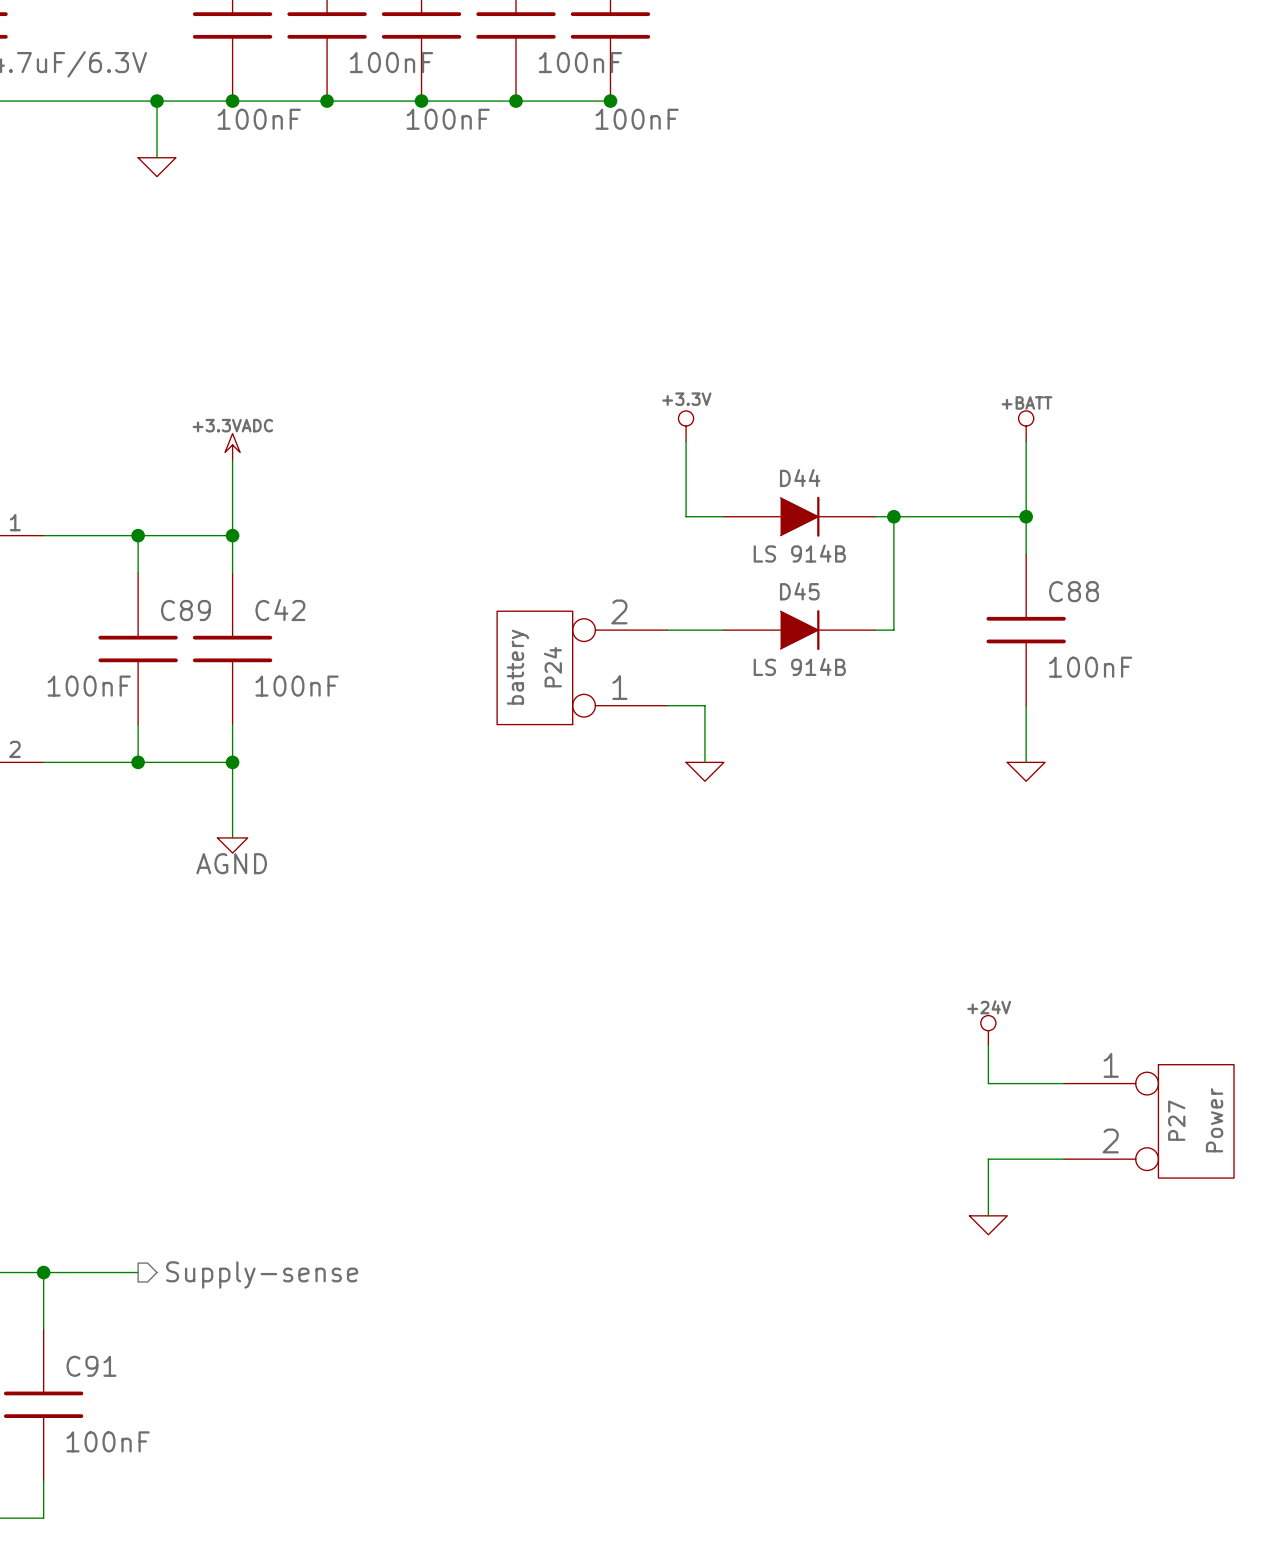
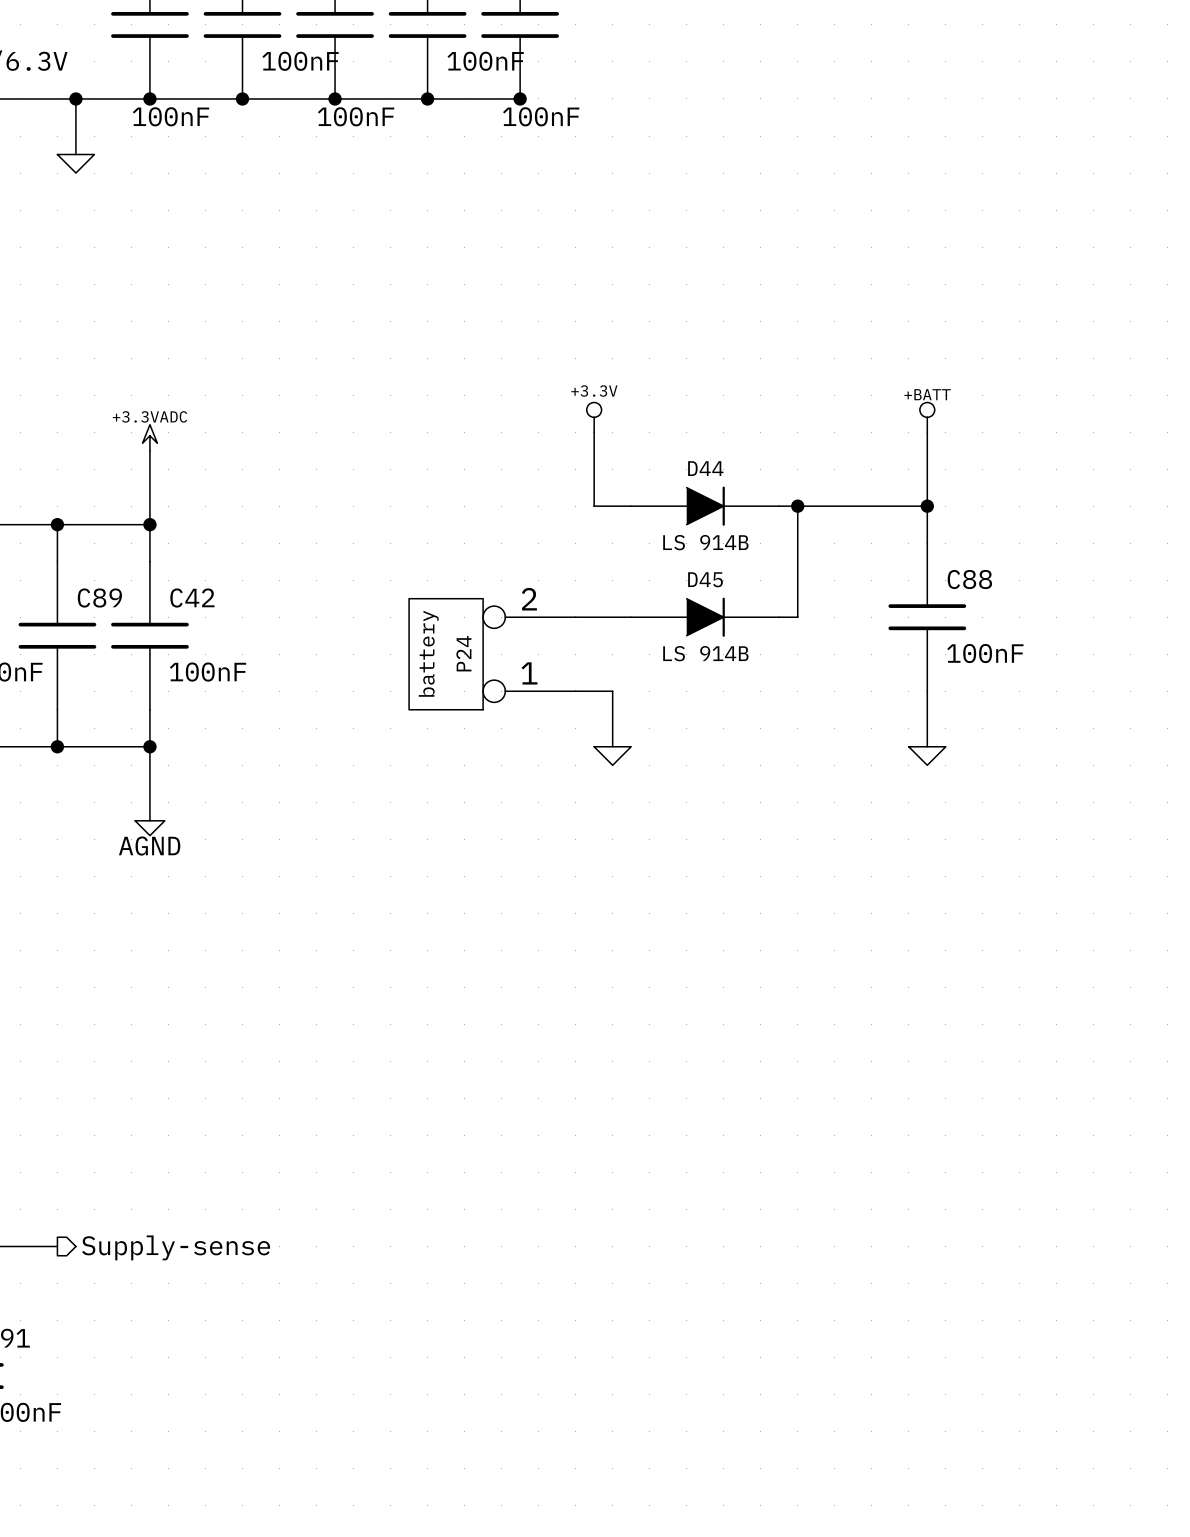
power symbol: +24V (988, 1030) -> none
wire: (988, 1045) (988, 1083) (1063, 1083) -> none
P27: Power (1148, 1121) -> none
wire: (1063, 1159) (988, 1159) (988, 1215) -> none
power symbol: (988, 1225) -> none

